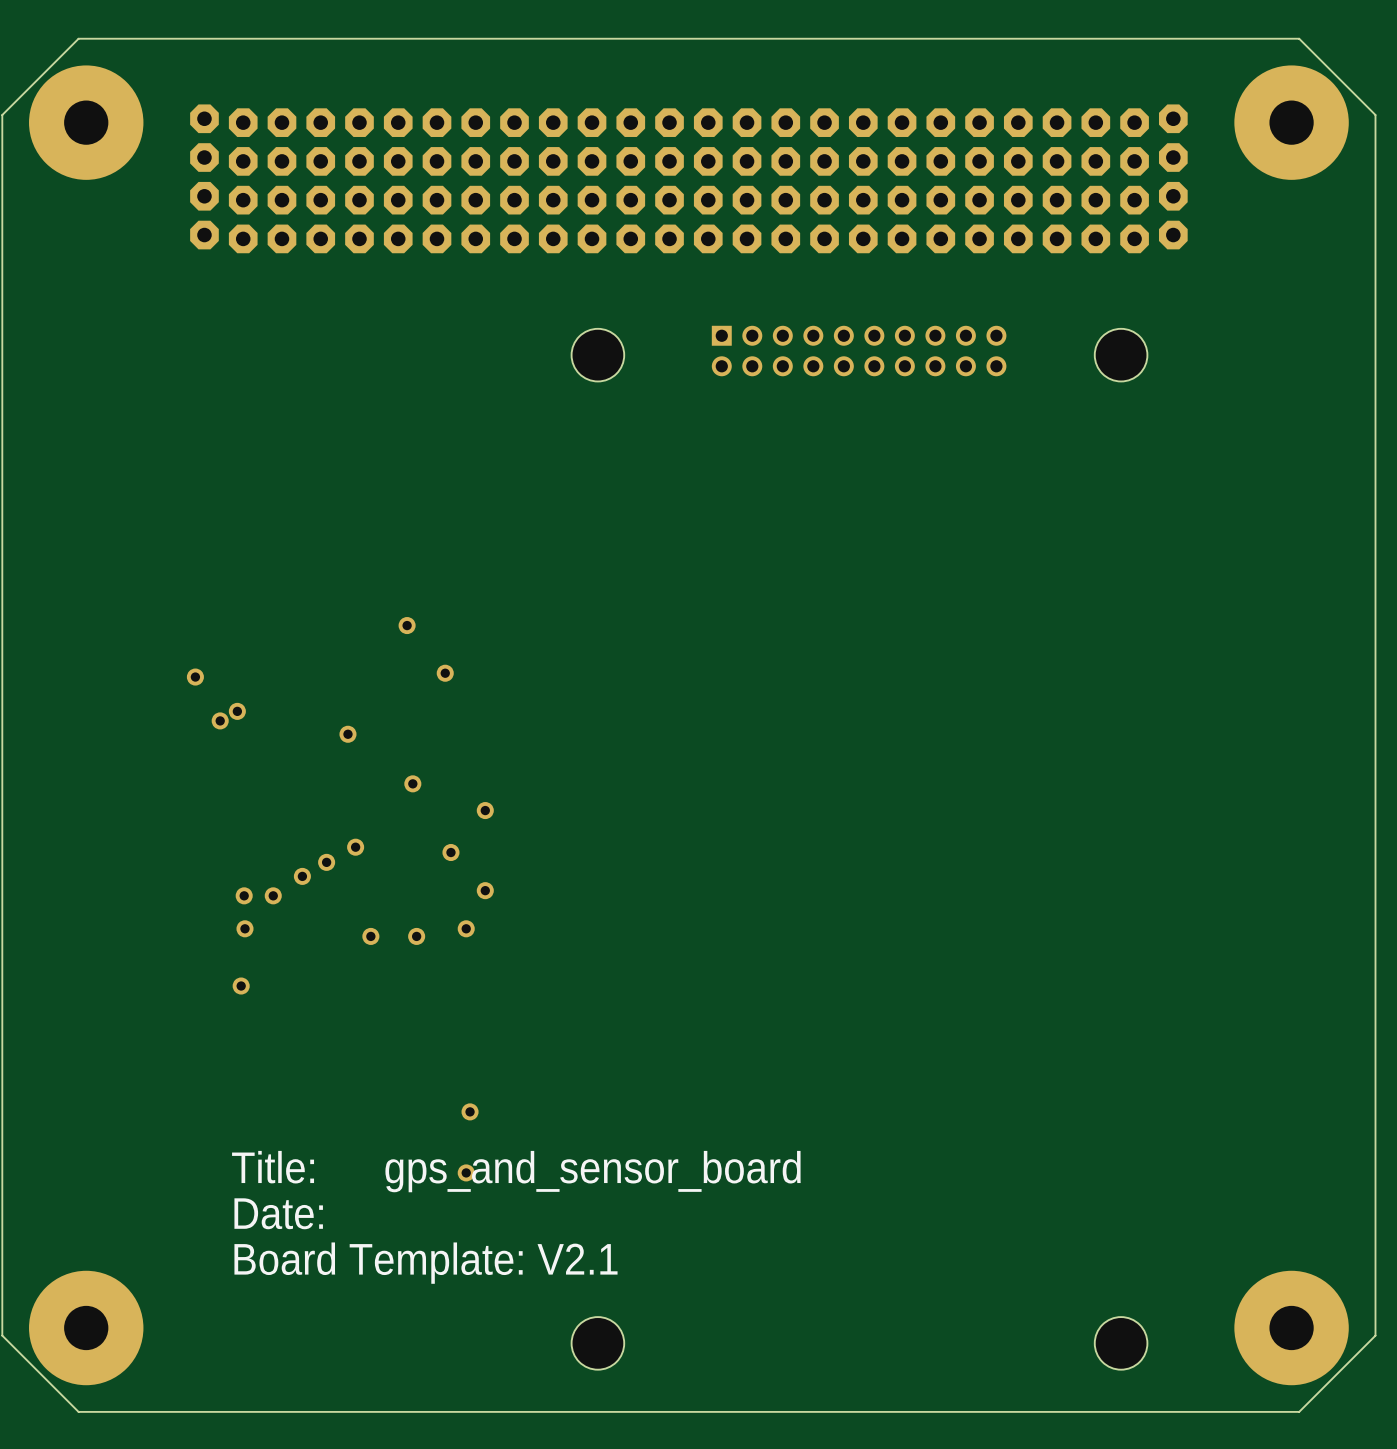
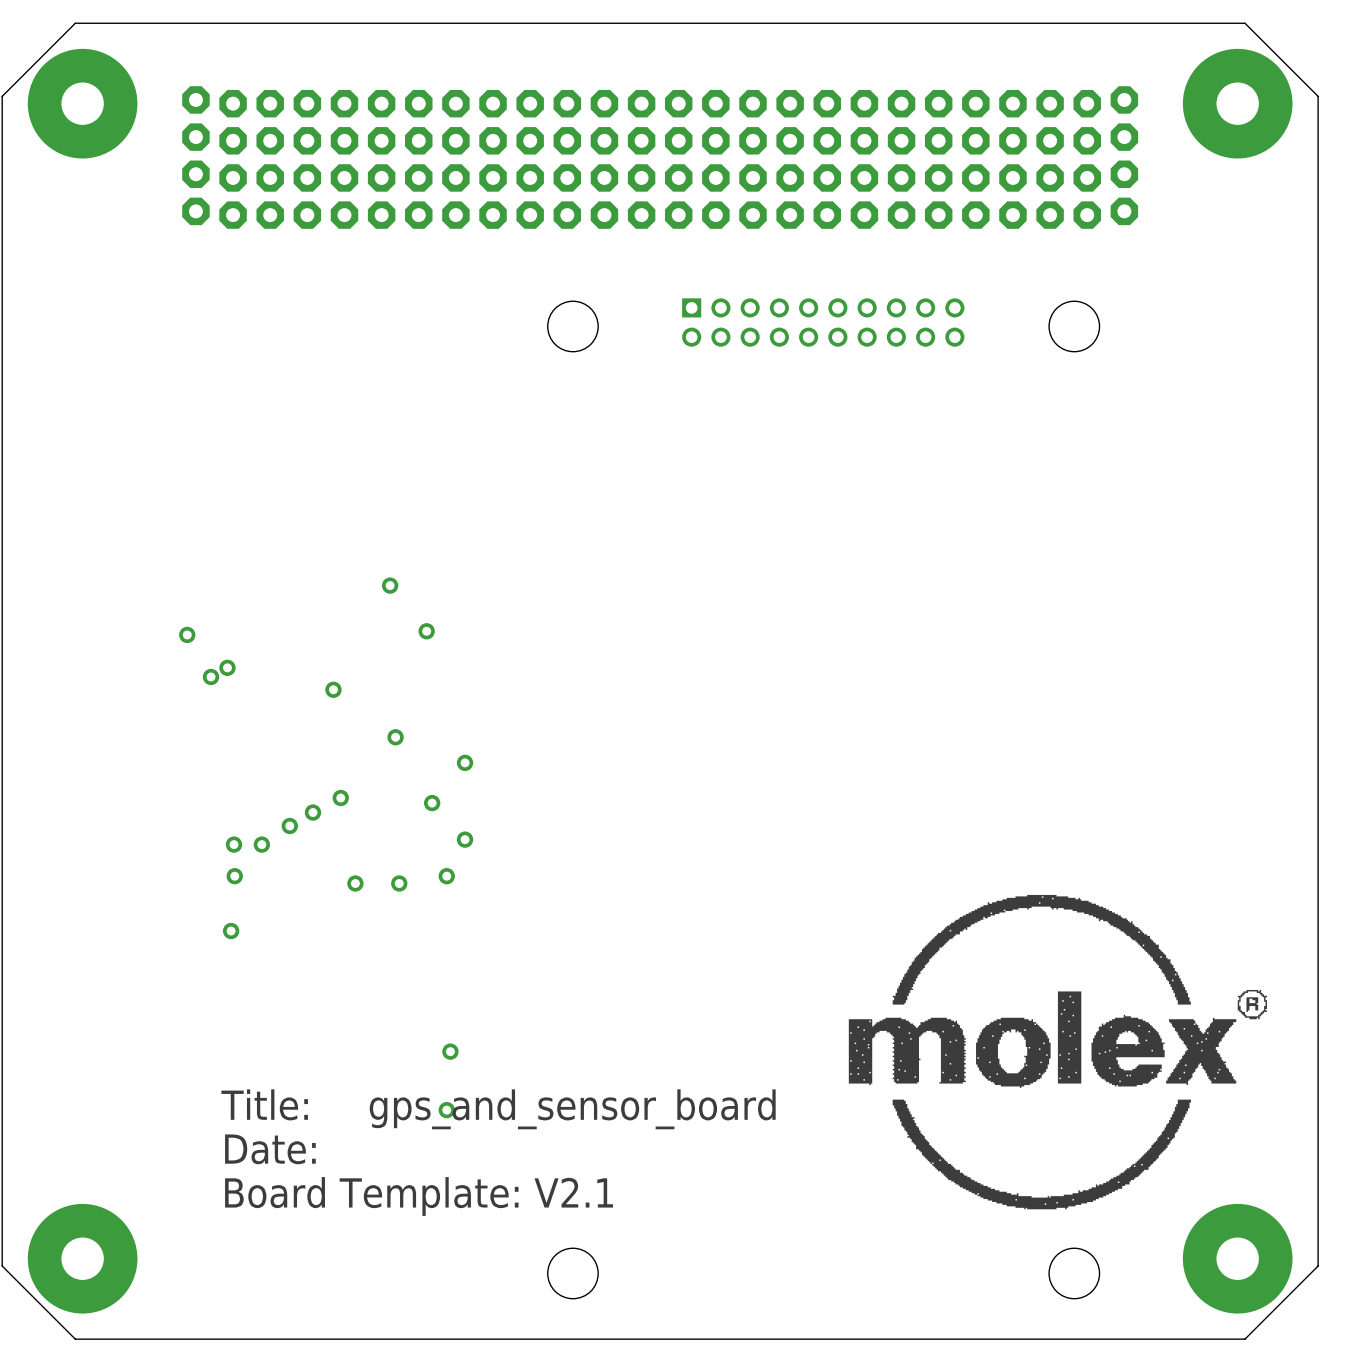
drawing: none -> [848, 894, 1267, 1210]

